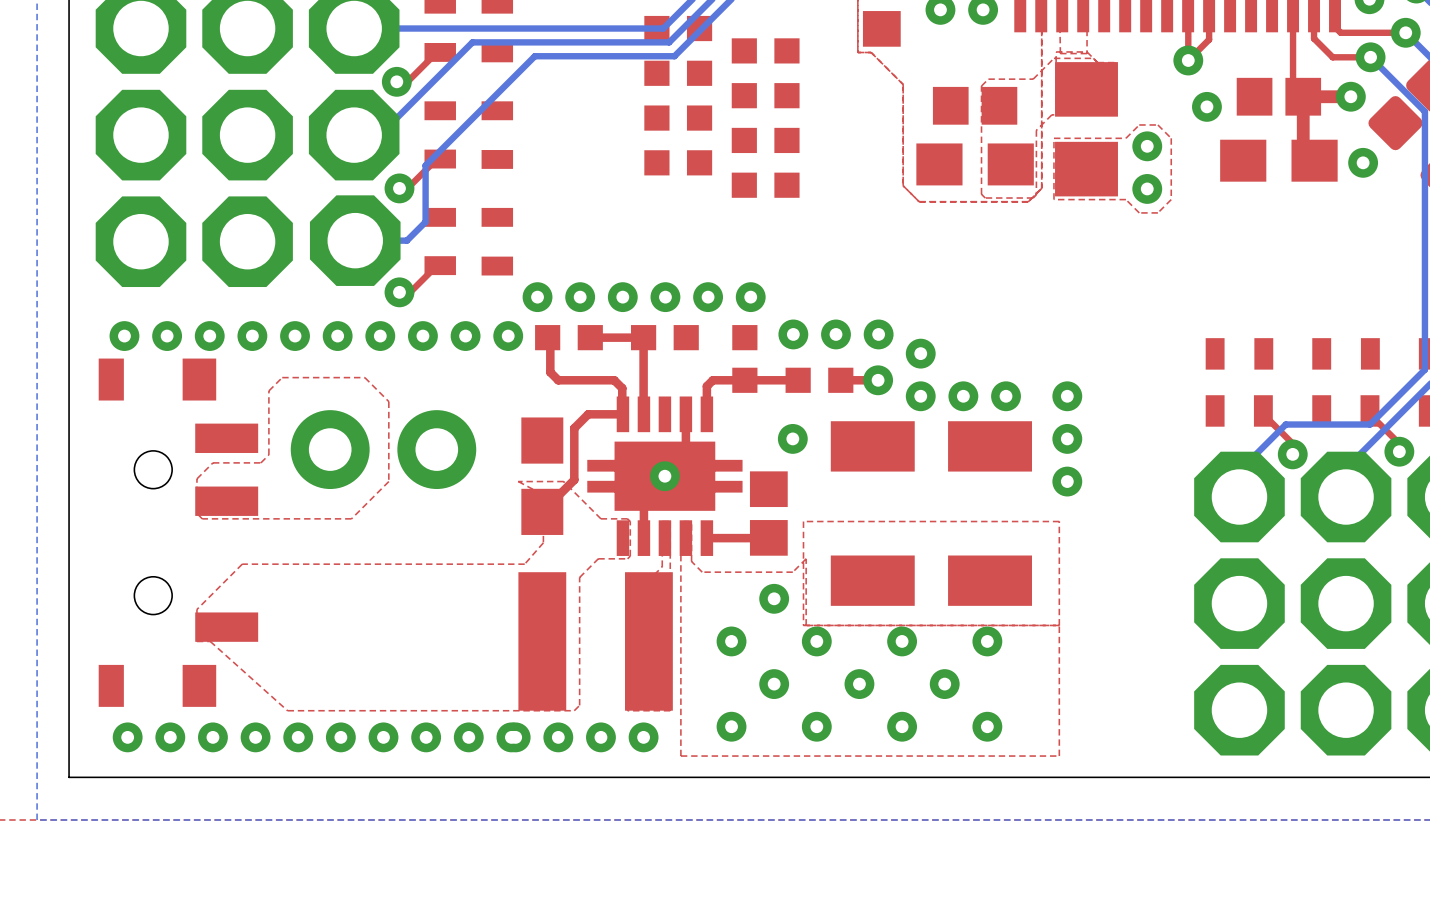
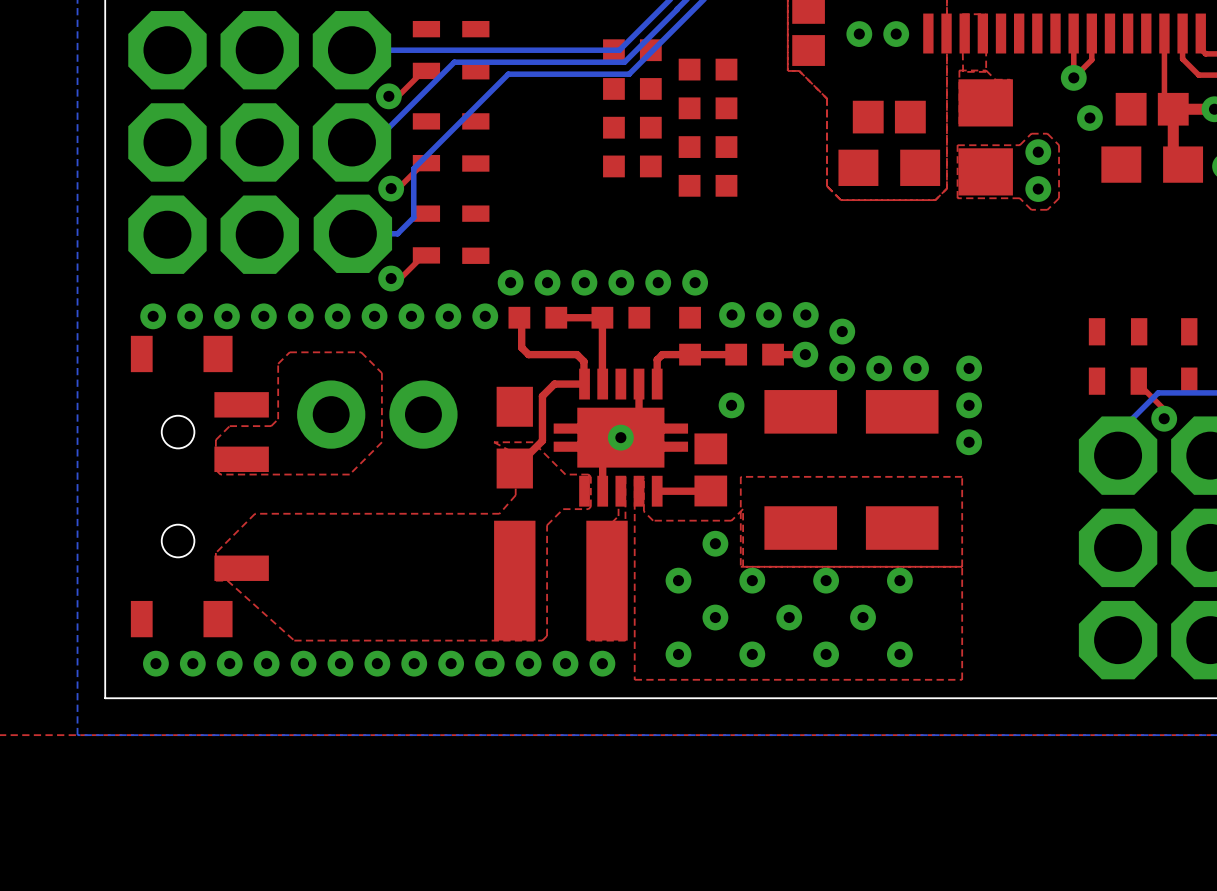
top zone outline: (1093, 58) (1053, 58) (1033, 79) (988, 79) (981, 86) (981, 194) (985, 198) (1033, 198) (1036, 194) (1036, 130) (1051, 114) (1115, 114) (1097, 96) (1097, 62) -> none

